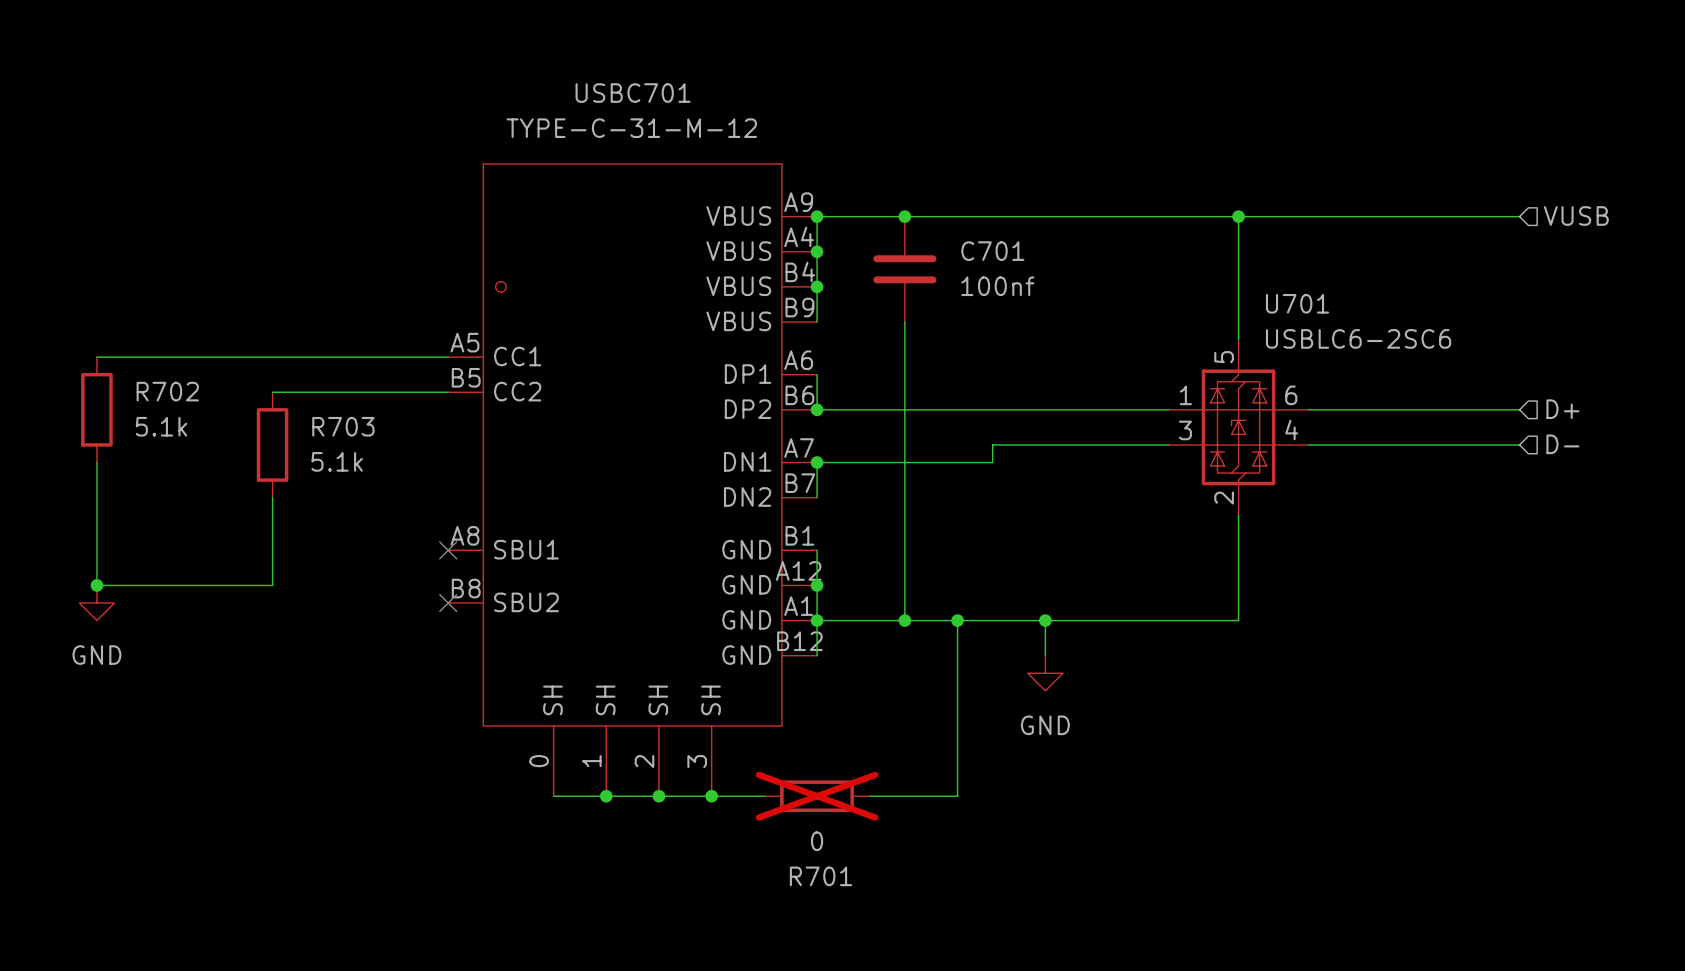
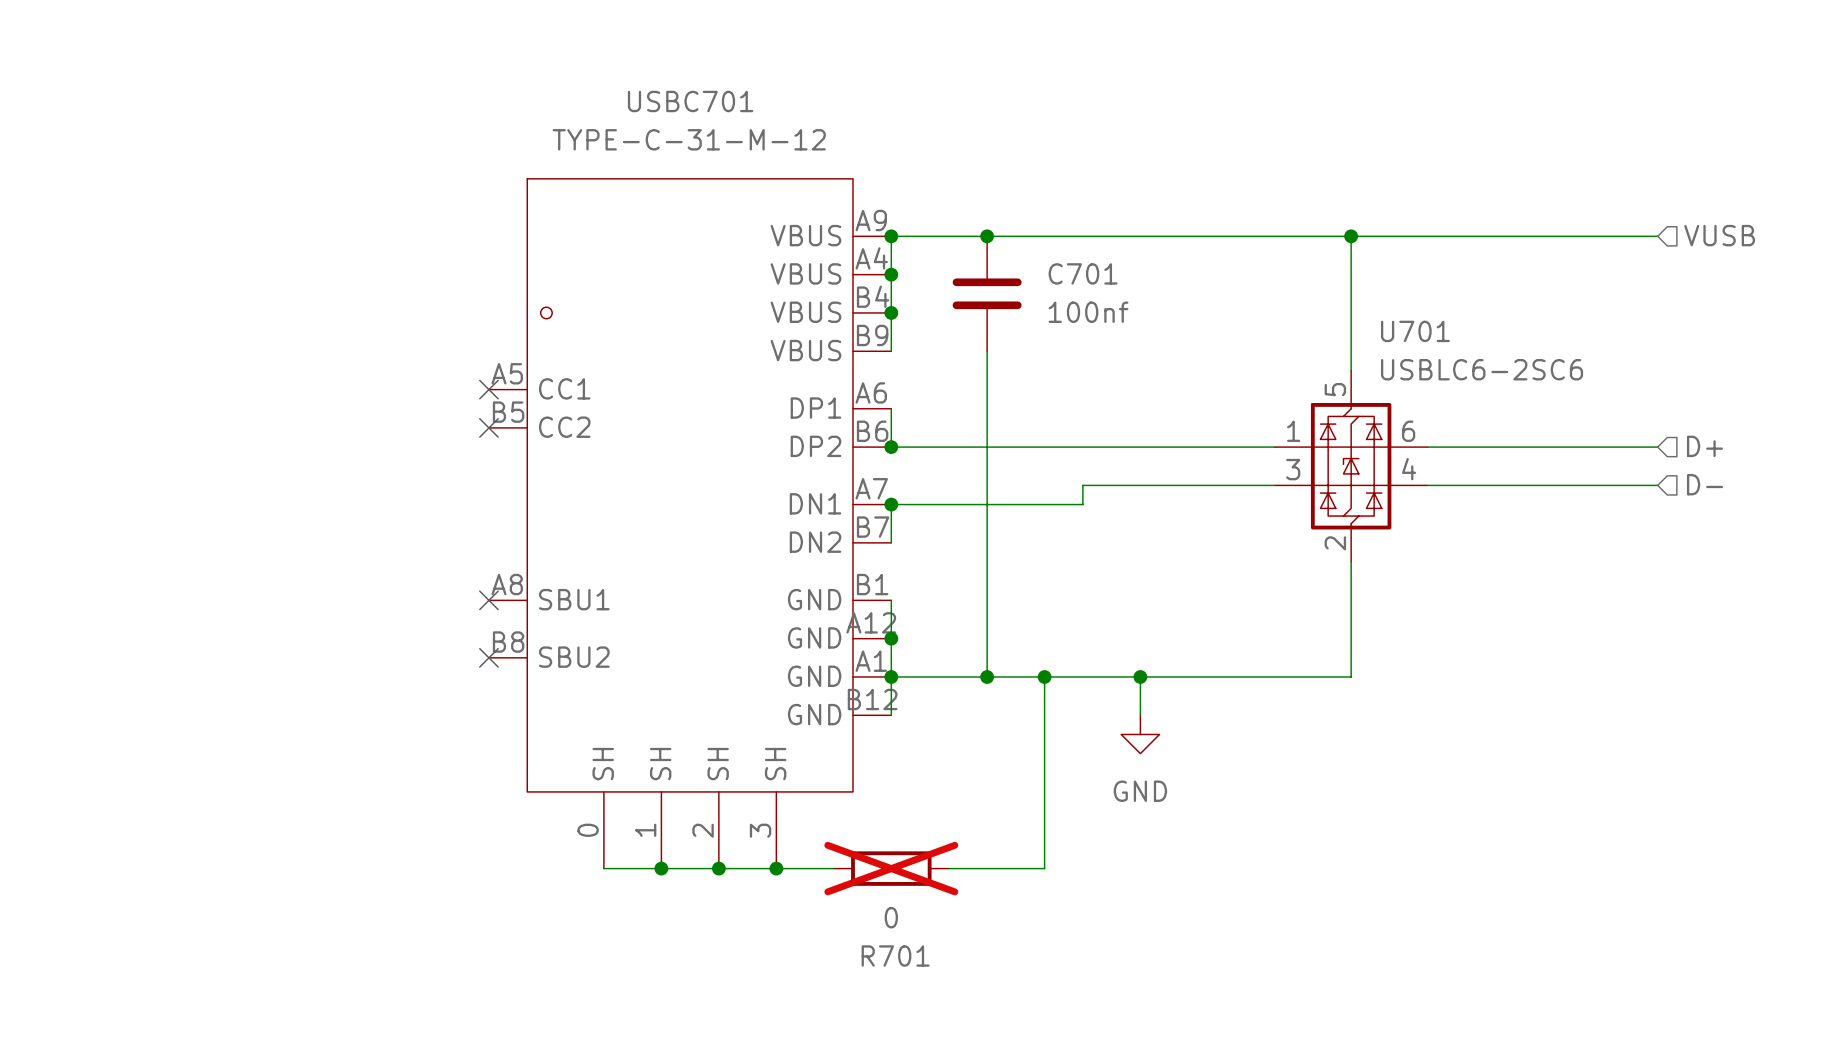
wire: (96, 357) (448, 357) -> none
no-connect mark: none -> (488, 389)
wire: (272, 392) (448, 392) -> none
no-connect mark: none -> (488, 427)
R702: 5.1k (96, 409) -> none
R703: 5.1k (272, 444) -> none
wire: (96, 462) (96, 585) (272, 585) (272, 497) -> none
junction: (96, 585) -> none
power symbol: GND (96, 603) -> none

